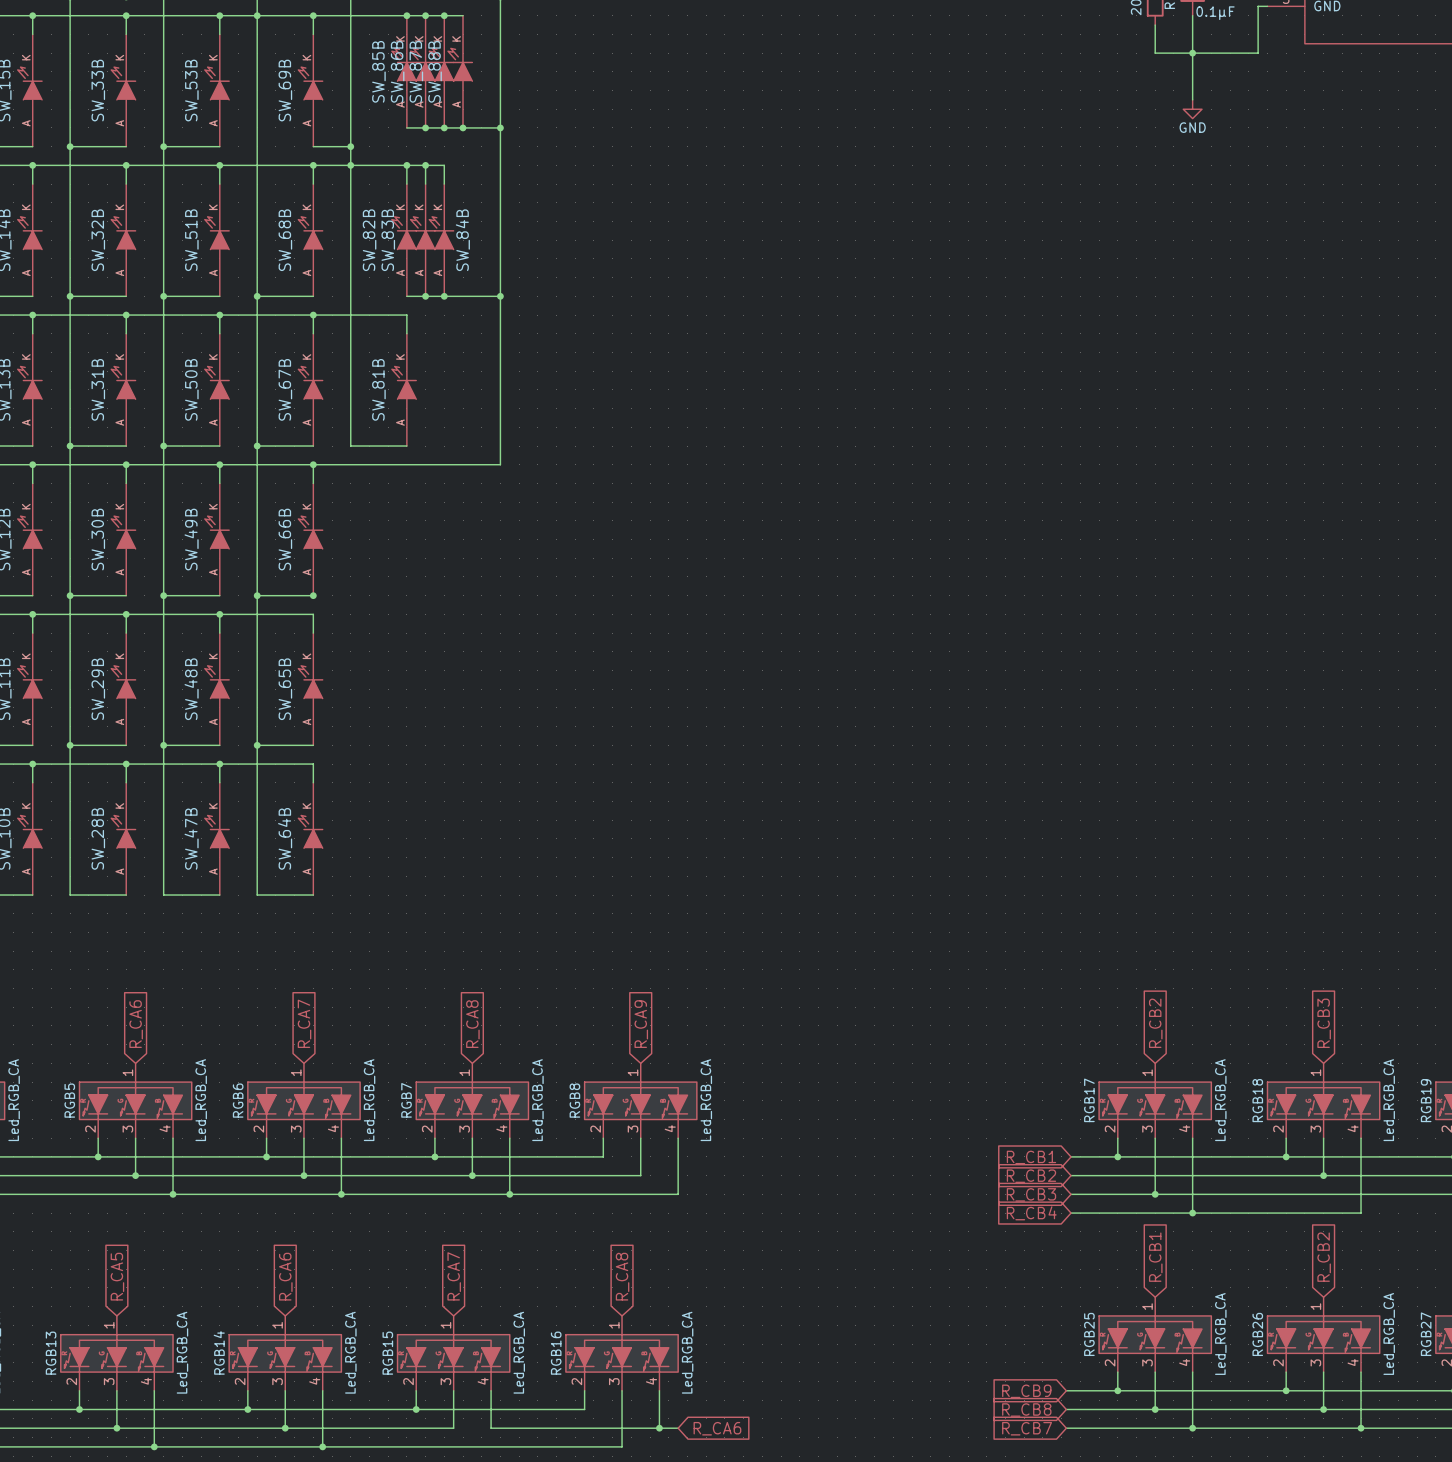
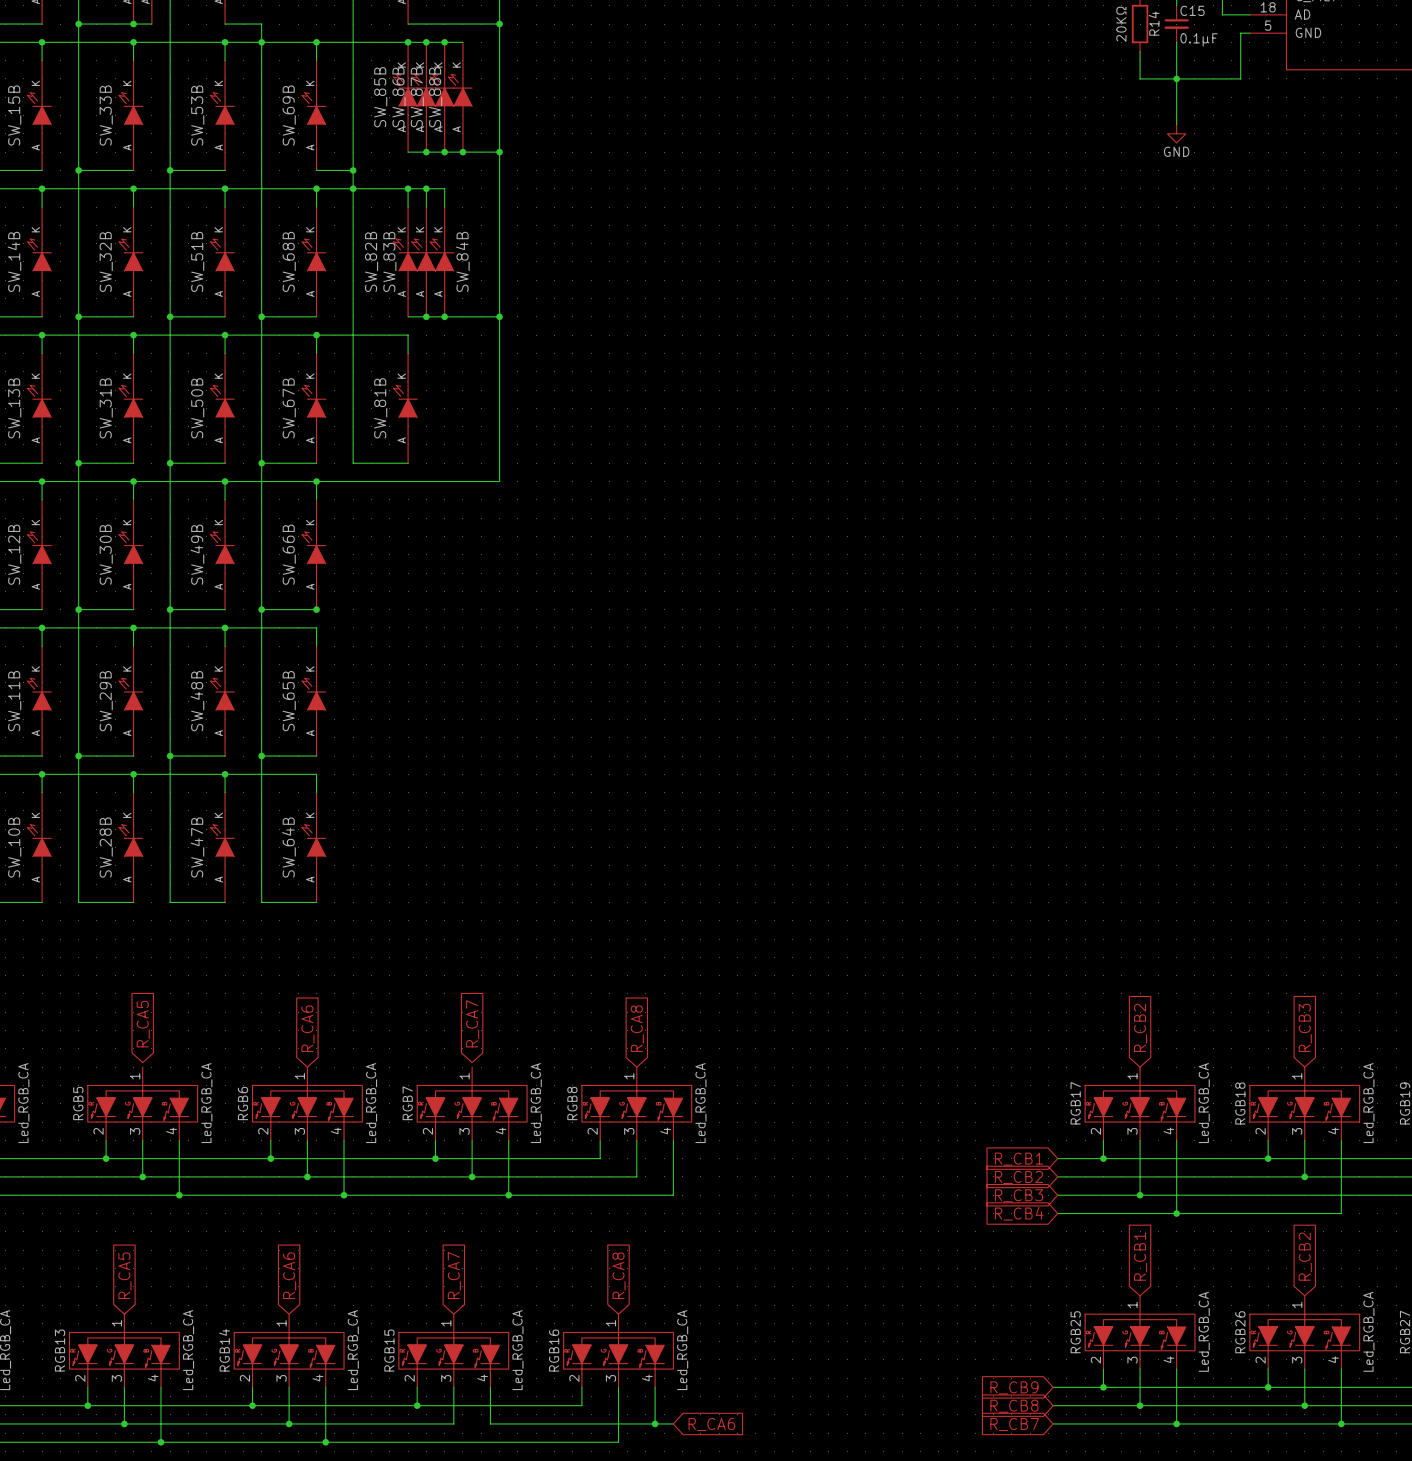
global label: R_CA7 (304, 1023) -> R_CA6 (307, 1028)
global label: R_CA6 (136, 1024) -> R_CA5 (143, 1024)
global label: R_CA8 (472, 1024) -> R_CA7 (472, 1023)
global label: R_CA9 (641, 1024) -> R_CA8 (637, 1028)

